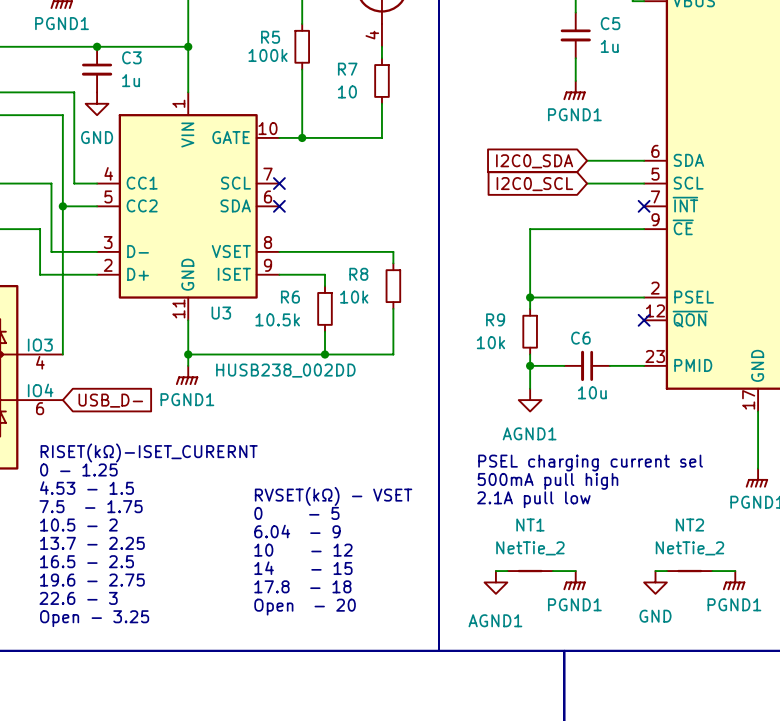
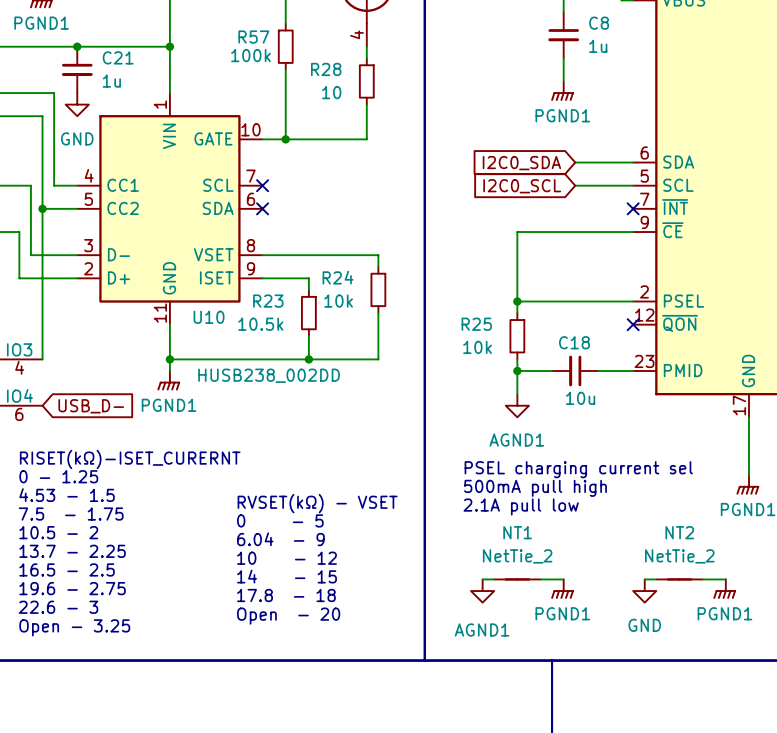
C5 name: C5 (610, 23) -> C8 (599, 23)
R5 name: R5 (270, 37) -> R57 (253, 37)
C3 name: C3 (131, 57) -> C21 (118, 57)
R7 name: R7 (347, 69) -> R28 (326, 69)
R8 name: R8 (358, 274) -> R24 (338, 277)
R6 name: R6 (290, 297) -> R23 (268, 301)
U3 name: U3 (221, 313) -> U10 (209, 317)
R9 name: R9 (495, 319) -> R25 (476, 324)
C6 name: C6 (580, 338) -> C18 (574, 342)

